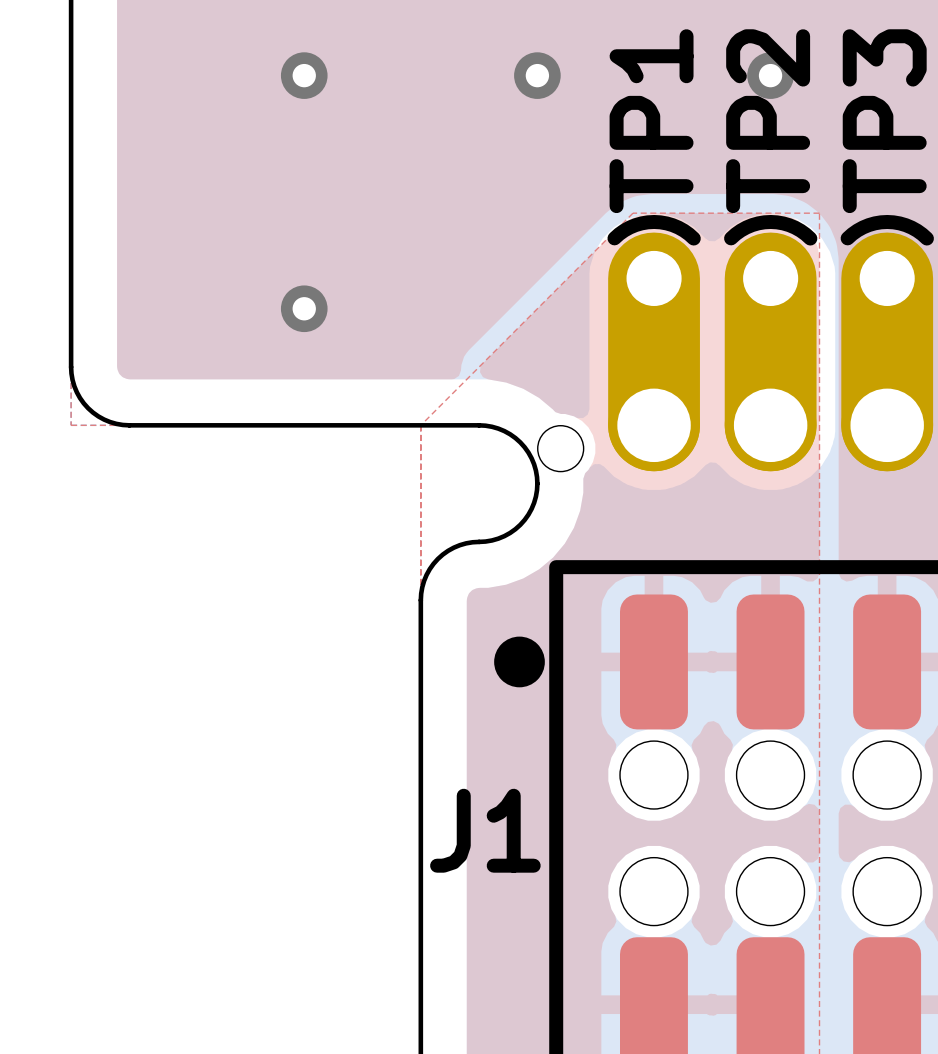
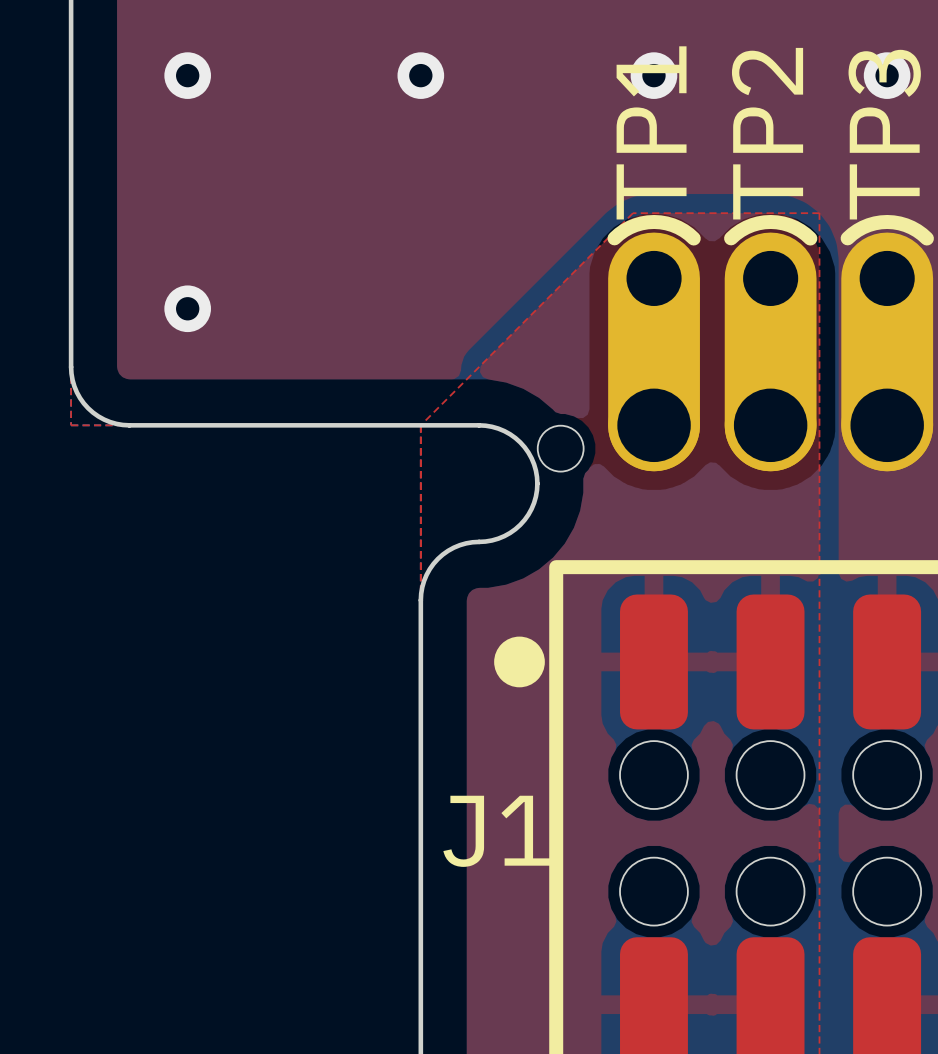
via: none -> (187, 75)
via: (304, 75) -> none
via: none -> (420, 75)
via: (537, 75) -> none
via: none -> (653, 75)
via: (770, 75) -> none
via: none -> (887, 75)
via position: (304, 308) -> (187, 308)

